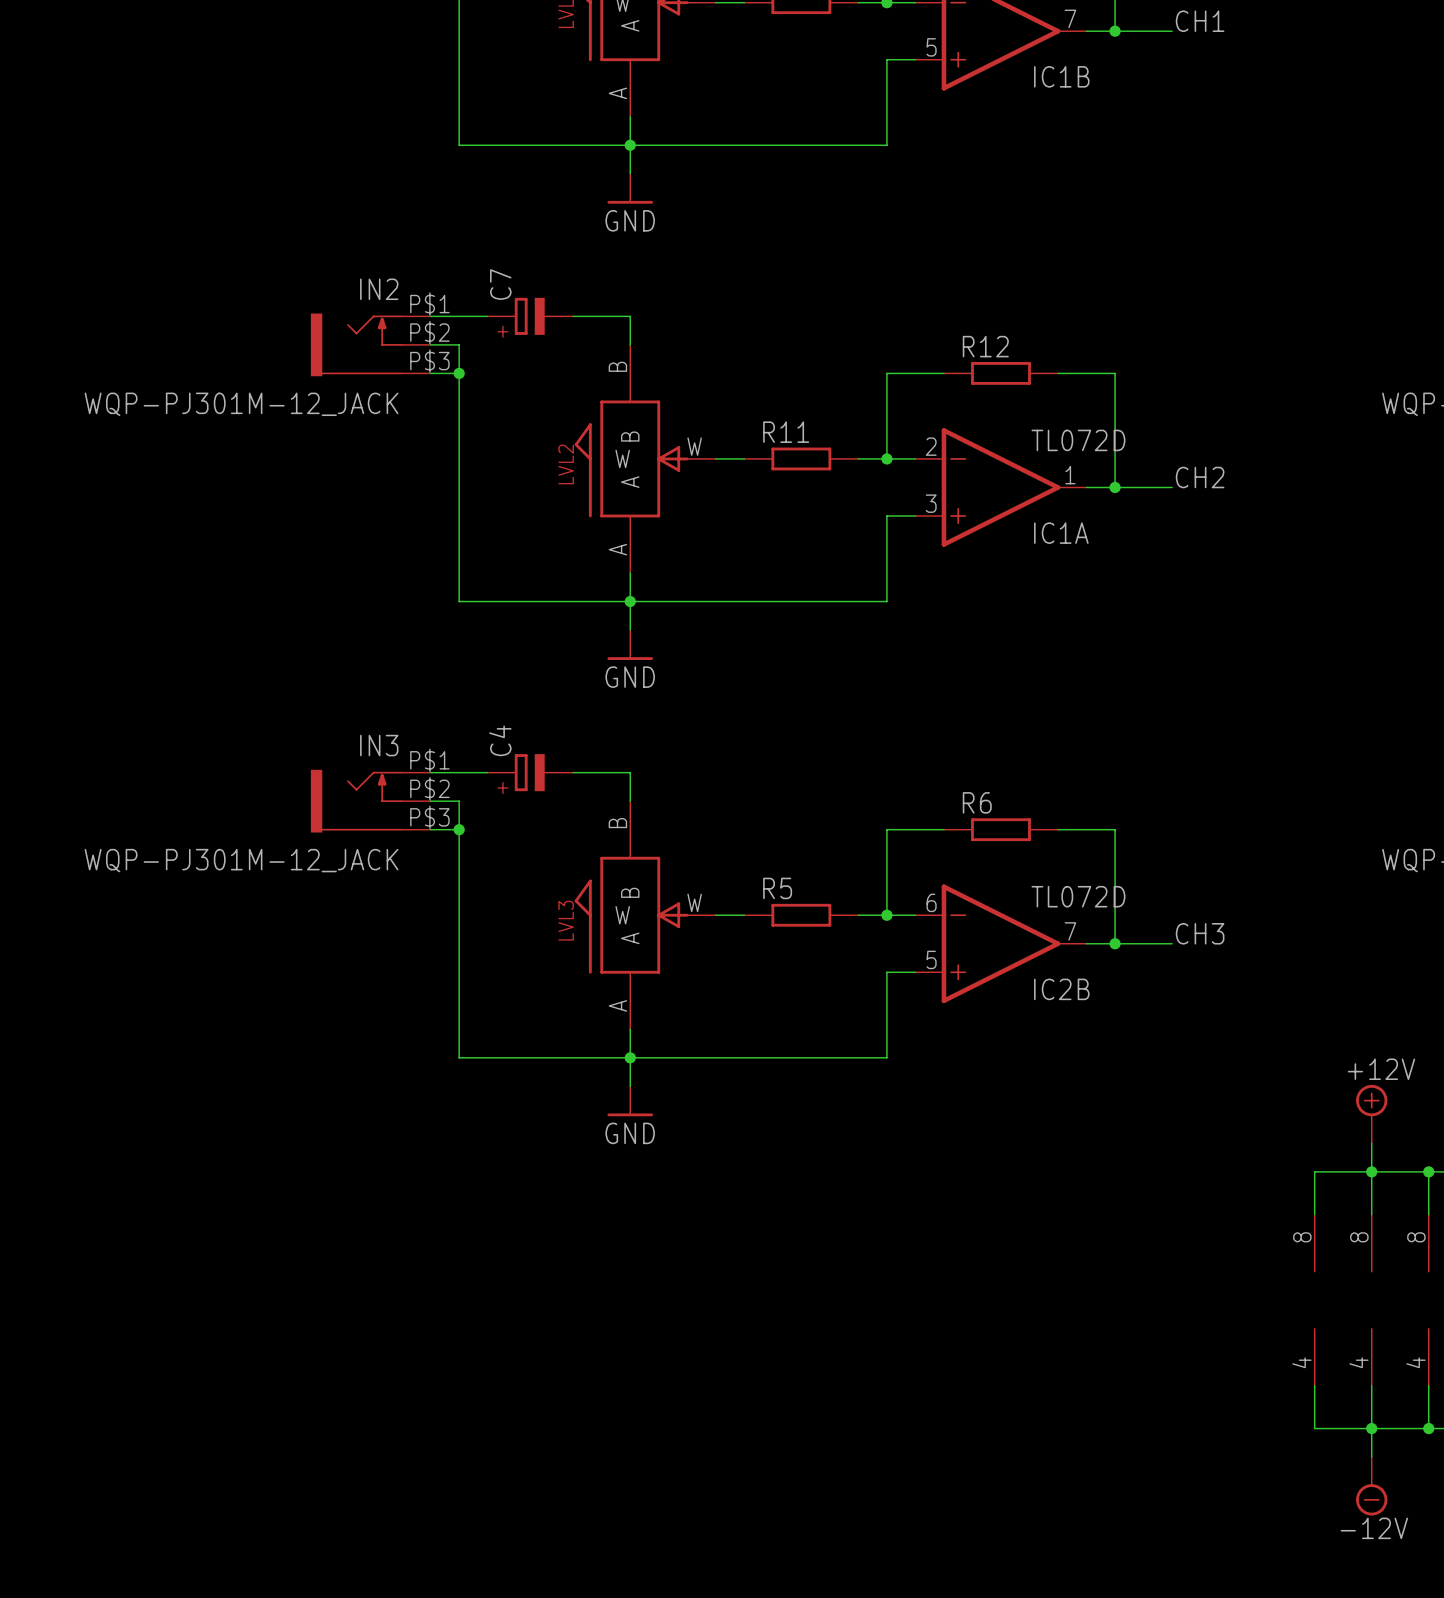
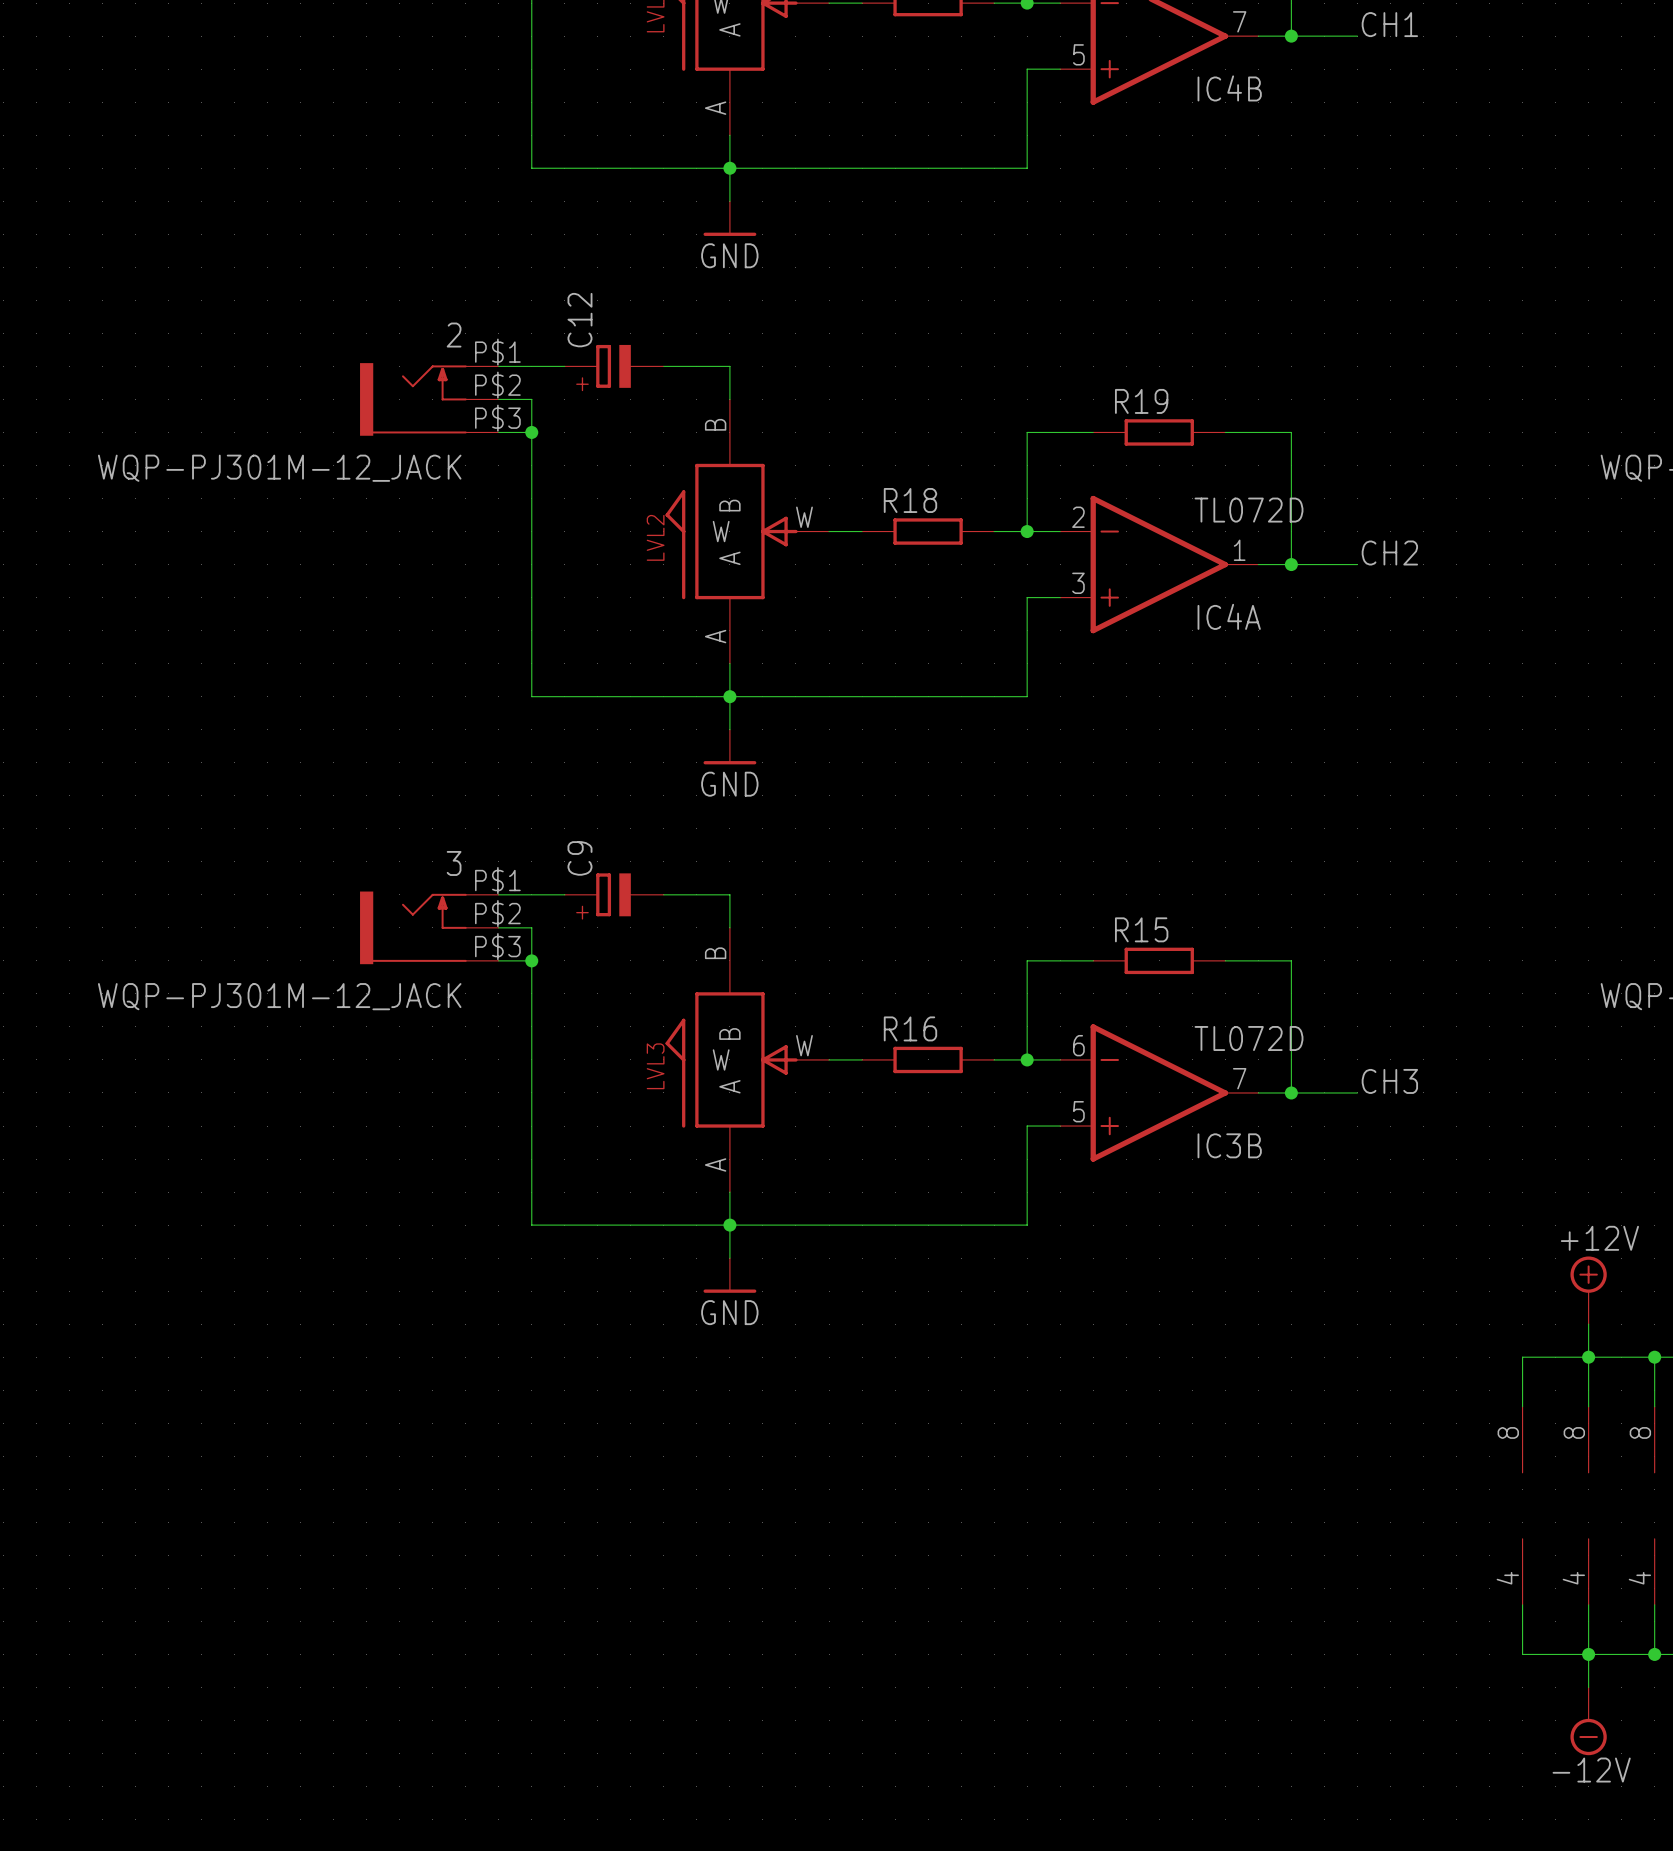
IC1B name: IC1B (1061, 76) -> IC4B (1229, 88)
C7 name: C7 (500, 284) -> C12 (579, 320)
IN2 name: IN2 (379, 289) -> 2 (454, 335)
R12 name: R12 (985, 346) -> R19 (1141, 401)
R11 name: R11 (786, 432) -> R18 (910, 500)
IC1A name: IC1A (1061, 533) -> IC4A (1229, 616)
C4 name: C4 (500, 740) -> C9 (579, 858)
IN3 name: IN3 (379, 745) -> 3 (454, 863)
R6 name: R6 (977, 802) -> R15 (1141, 929)
R5 name: R5 (777, 888) -> R16 (910, 1028)
IC2B name: IC2B (1061, 989) -> IC3B (1229, 1145)

